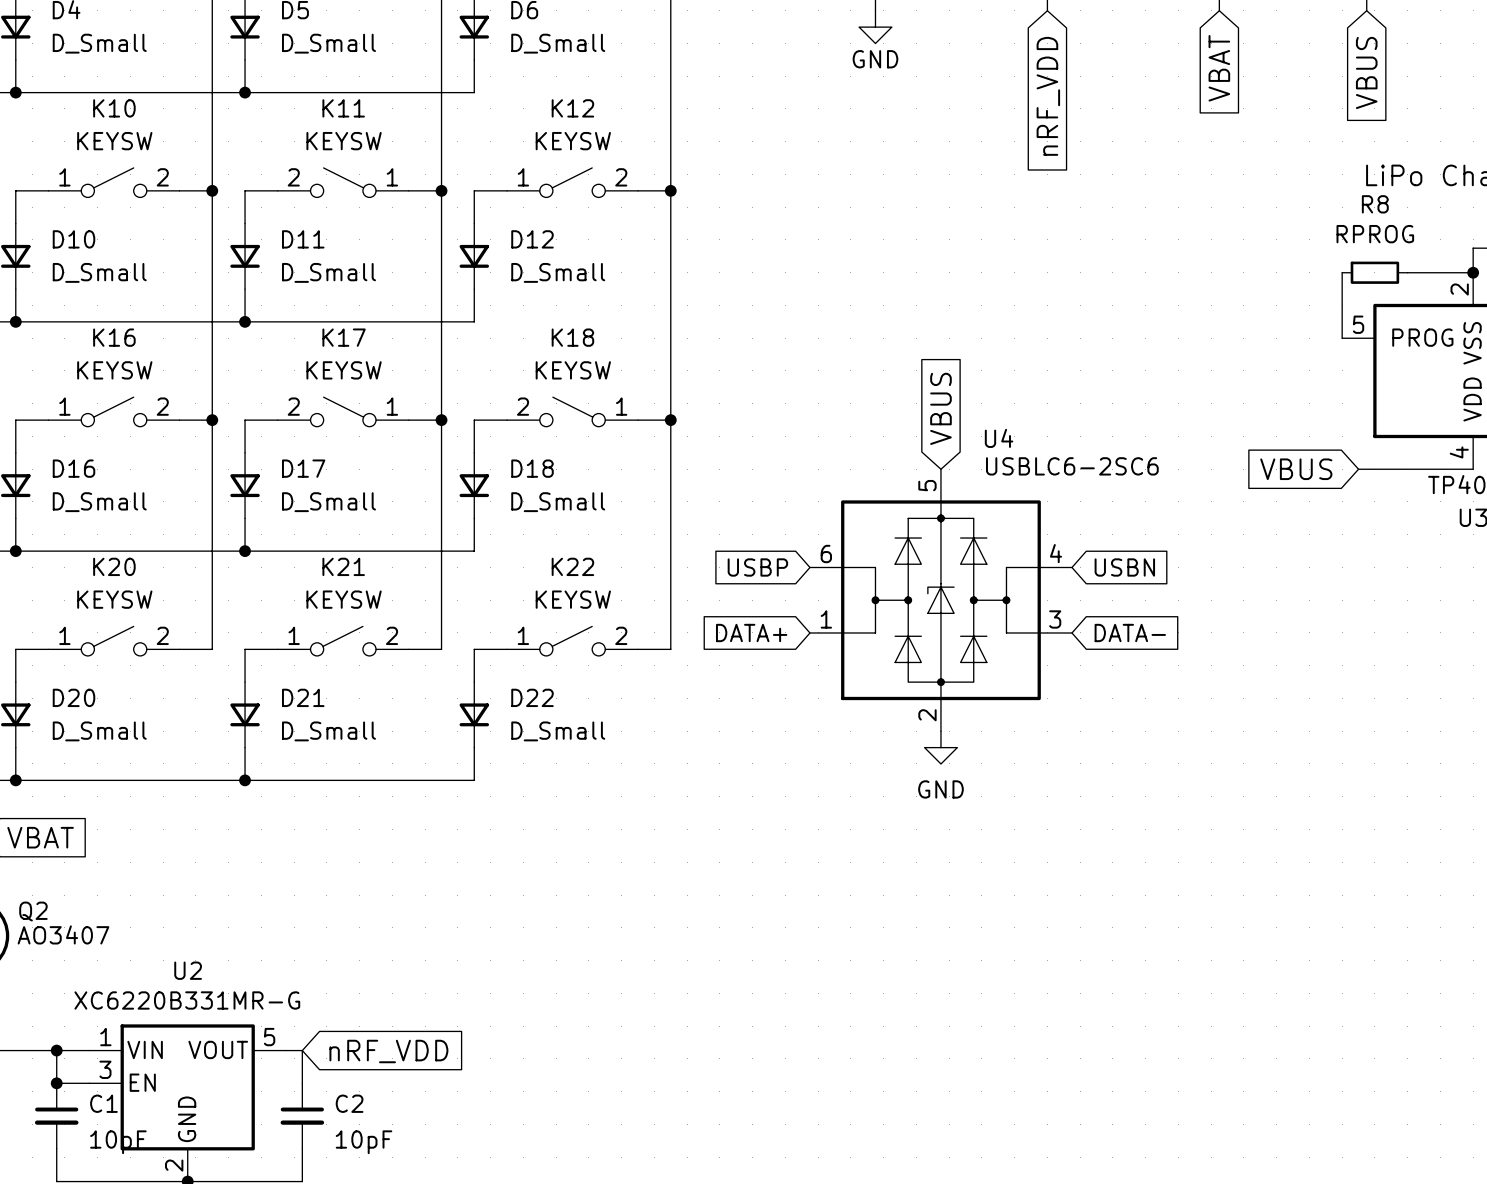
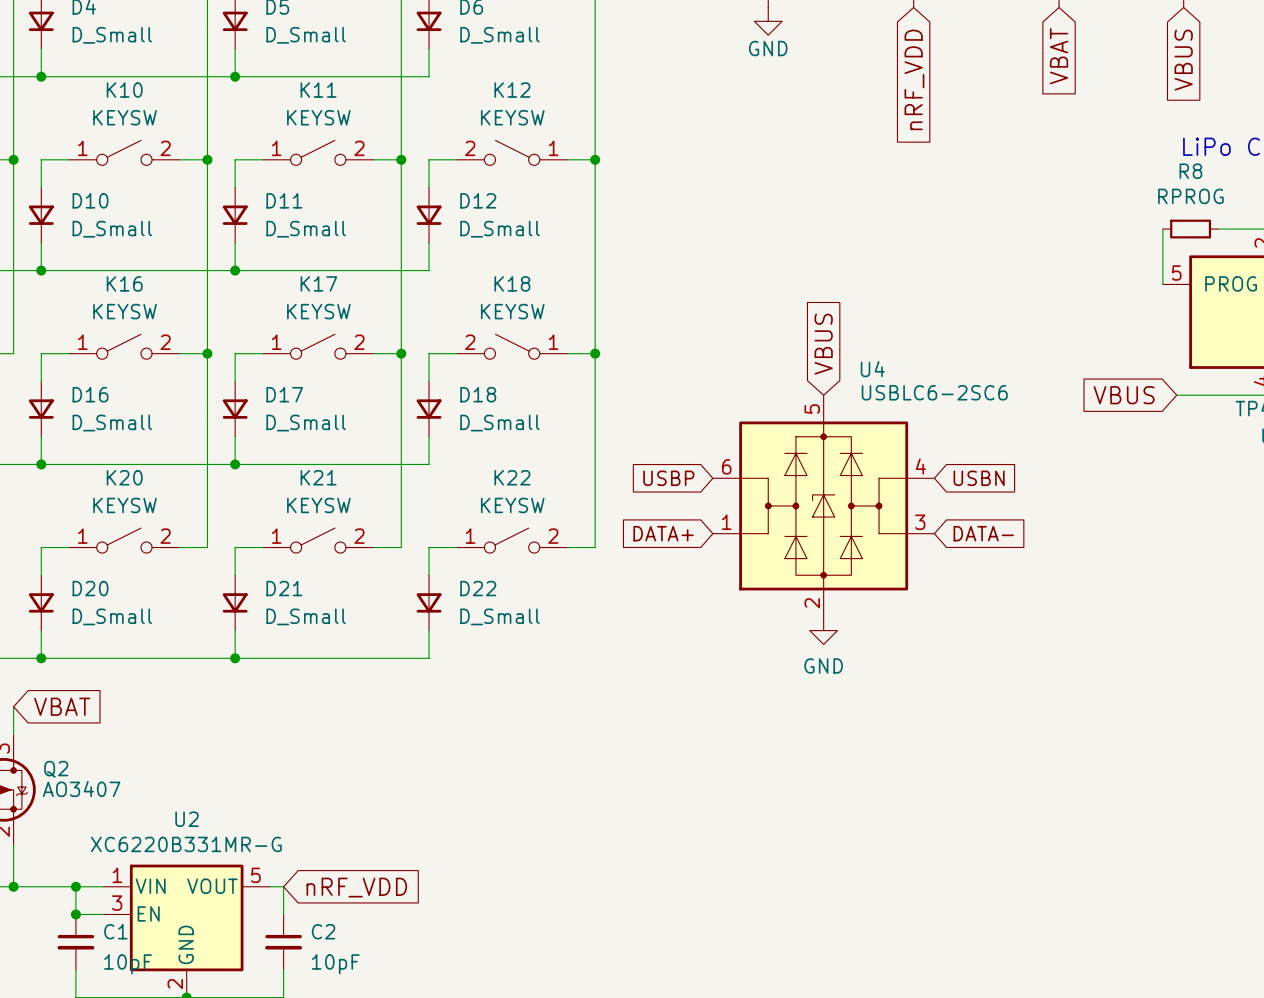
K11 flip: as is (343, 182) -> left-right (318, 152)
K12 flip: as is (572, 182) -> left-right (512, 152)
K17 flip: as is (343, 411) -> left-right (318, 346)

